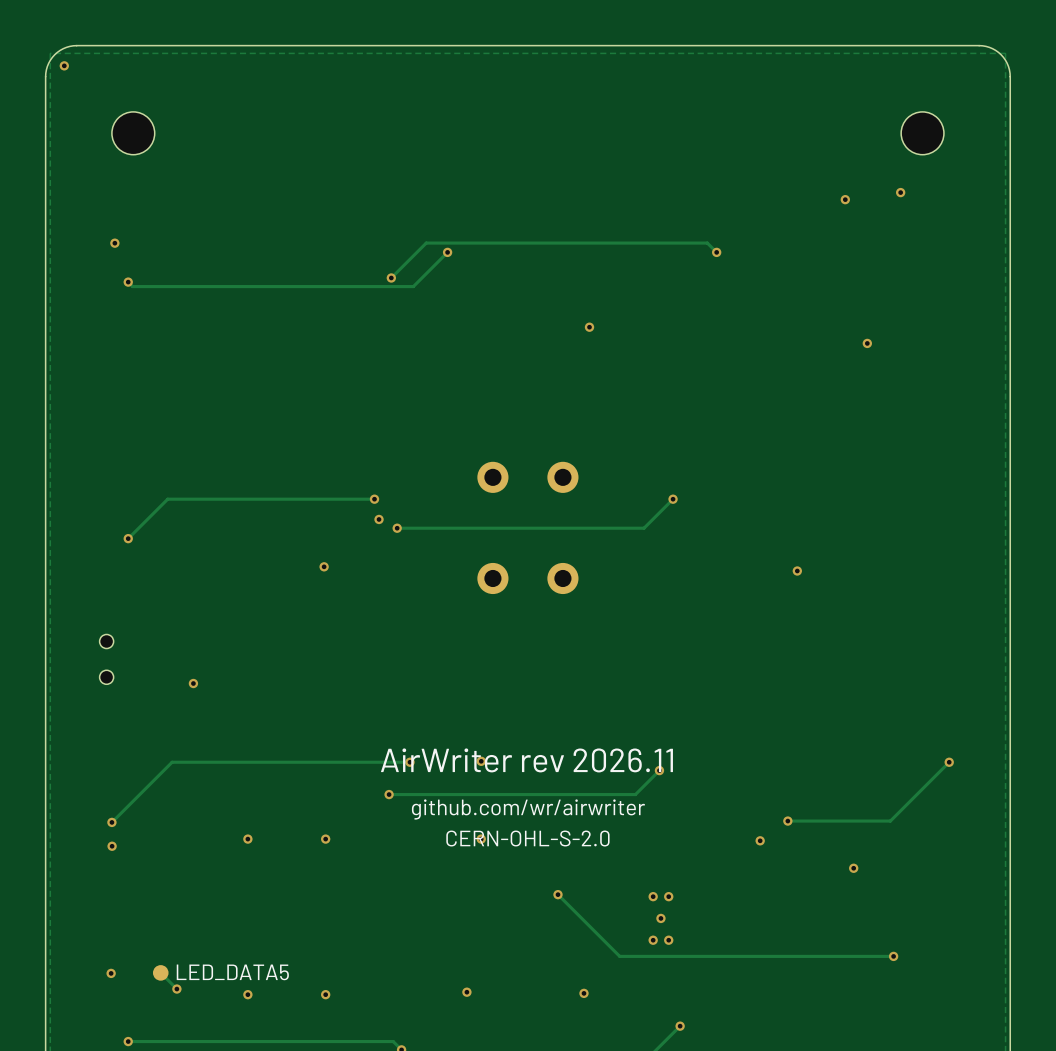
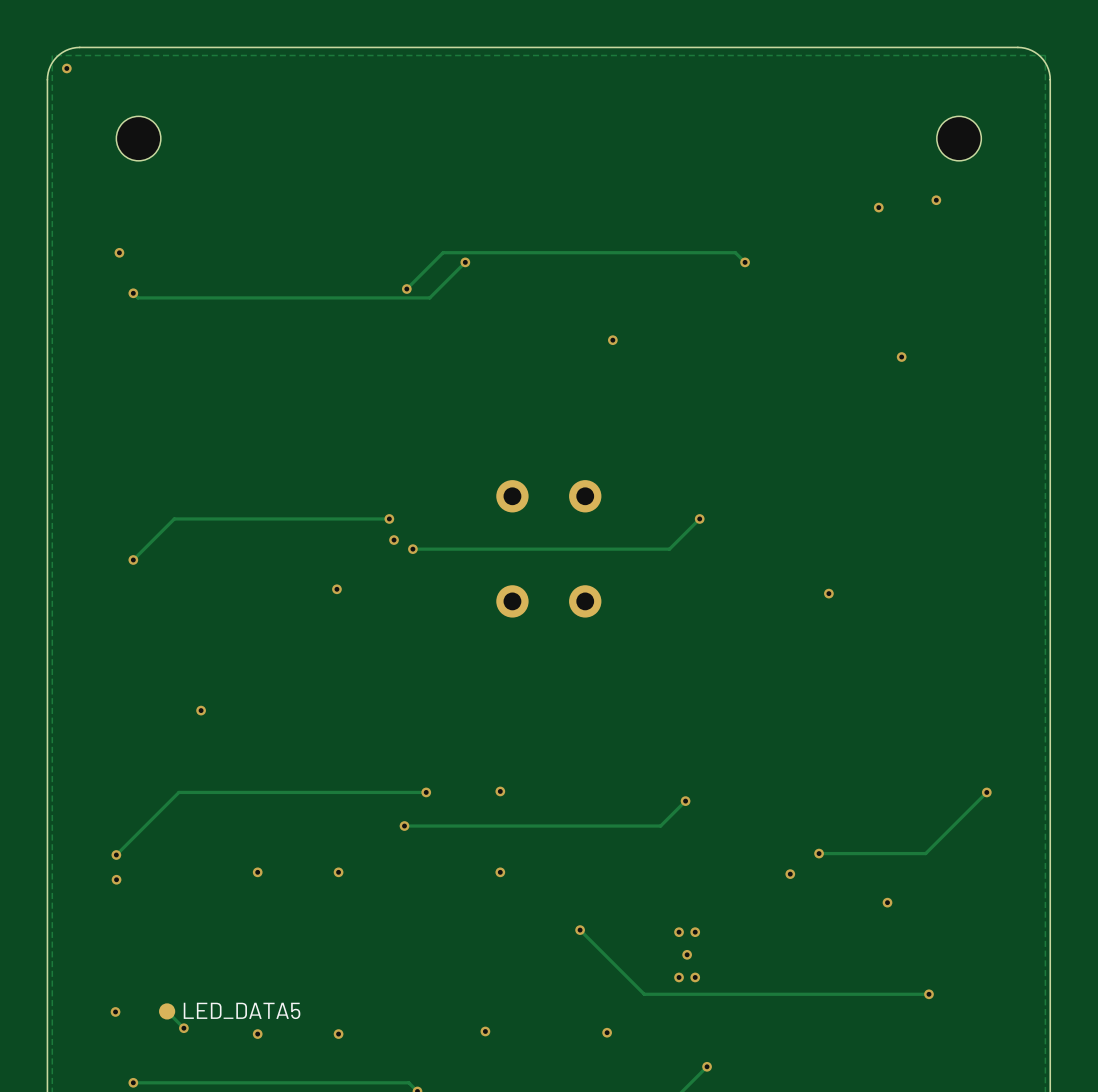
part: (106, 659) -> none
text: AirWriter rev 2026.11 (526, 760) -> none
text: github.com/wr/airwriter (528, 809) -> none
text: CERN-OHL-S-2.0 (527, 838) -> none

